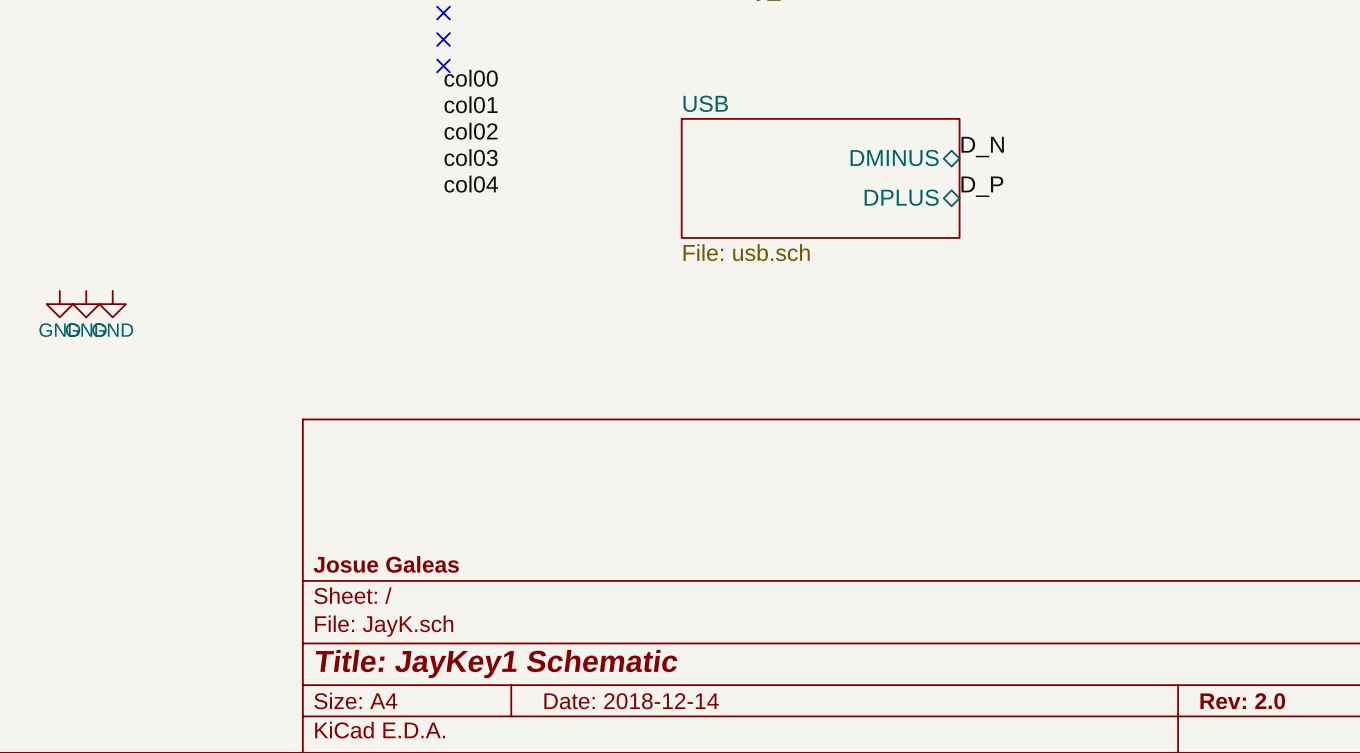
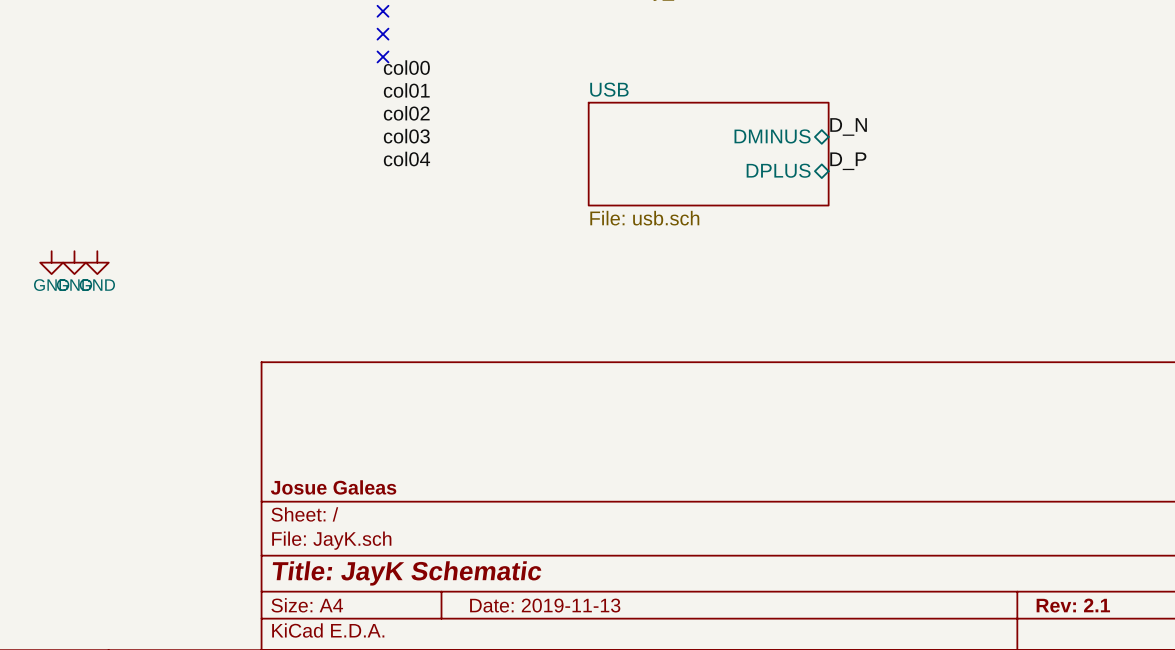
title block: Title: JayKey1 Schematic (496, 664) -> Title: JayK Schematic (407, 573)
title block: Date: 2018-12-14 (631, 701) -> Date: 2019-11-13 (545, 605)
title block: Rev: 2.0 (1242, 701) -> Rev: 2.1 (1073, 605)

